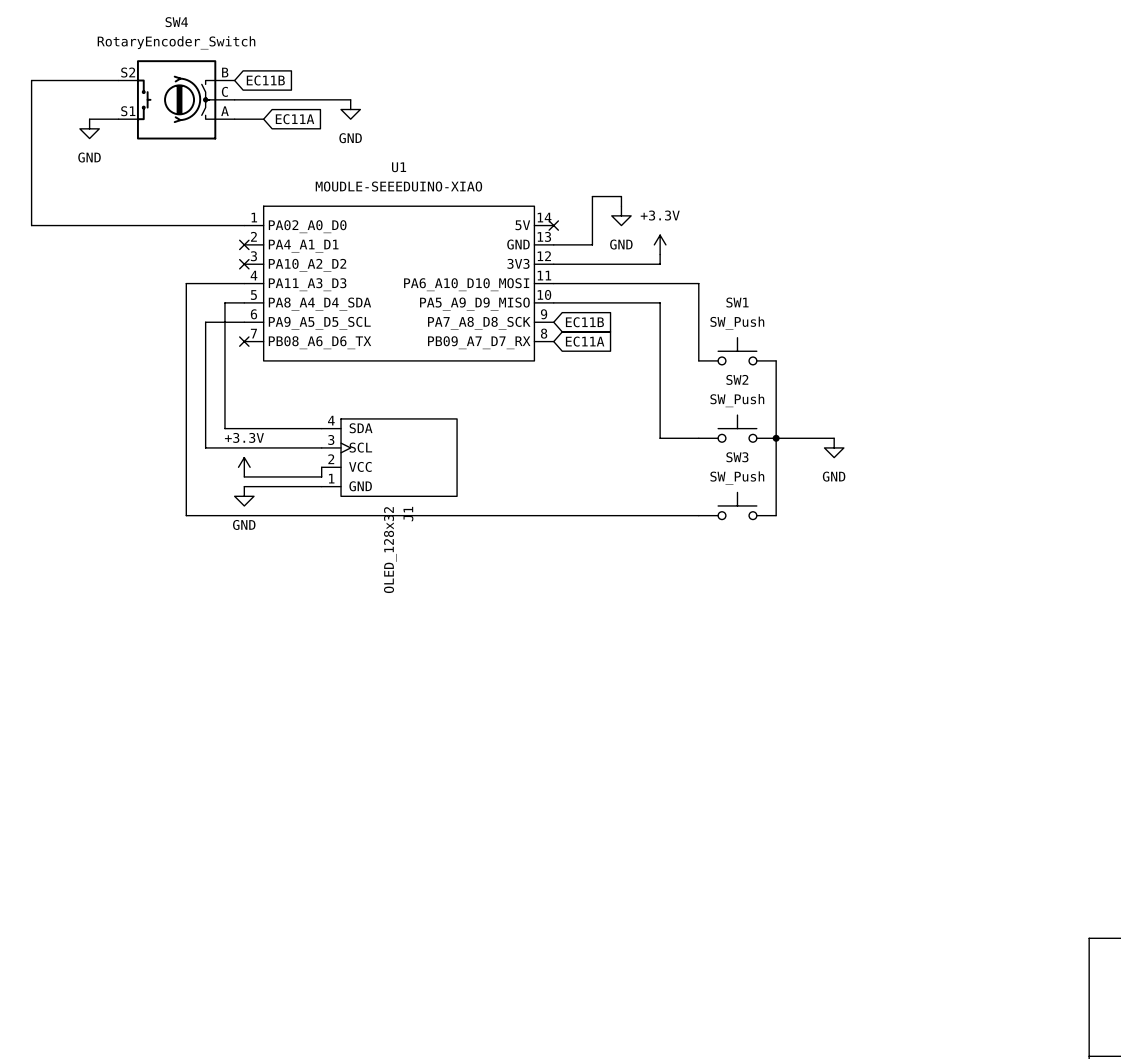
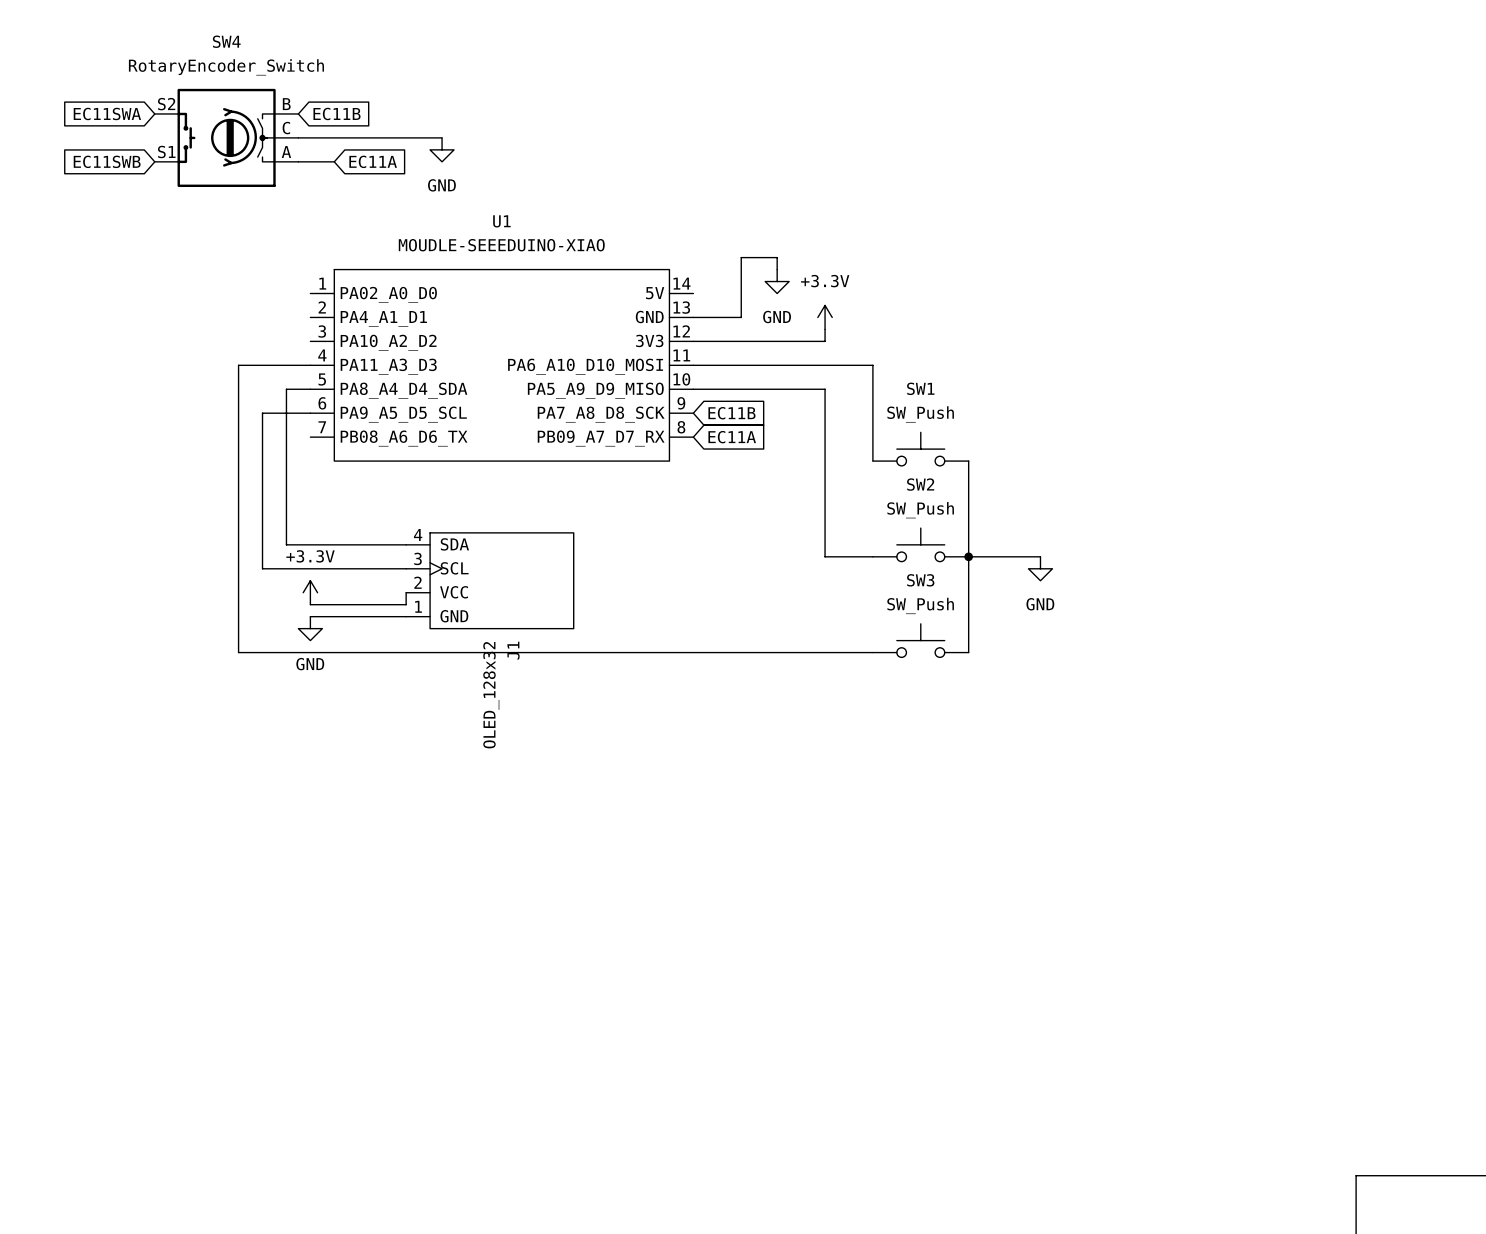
global label: none -> EC11SWA (107, 113)
wire: (118, 80) (31, 80) (31, 225) (244, 225) -> none
global label: none -> EC11SWB (107, 161)
wire: (89, 119) (118, 119) -> none
power symbol: GND (89, 128) -> none
no-connect mark: (553, 225) -> none
no-connect mark: (244, 244) -> none
no-connect mark: (244, 264) -> none
no-connect mark: (244, 341) -> none

